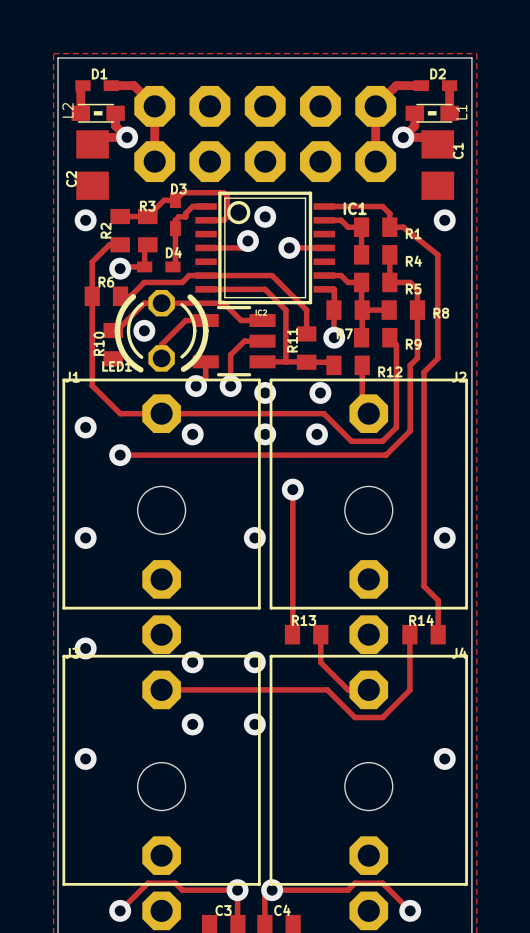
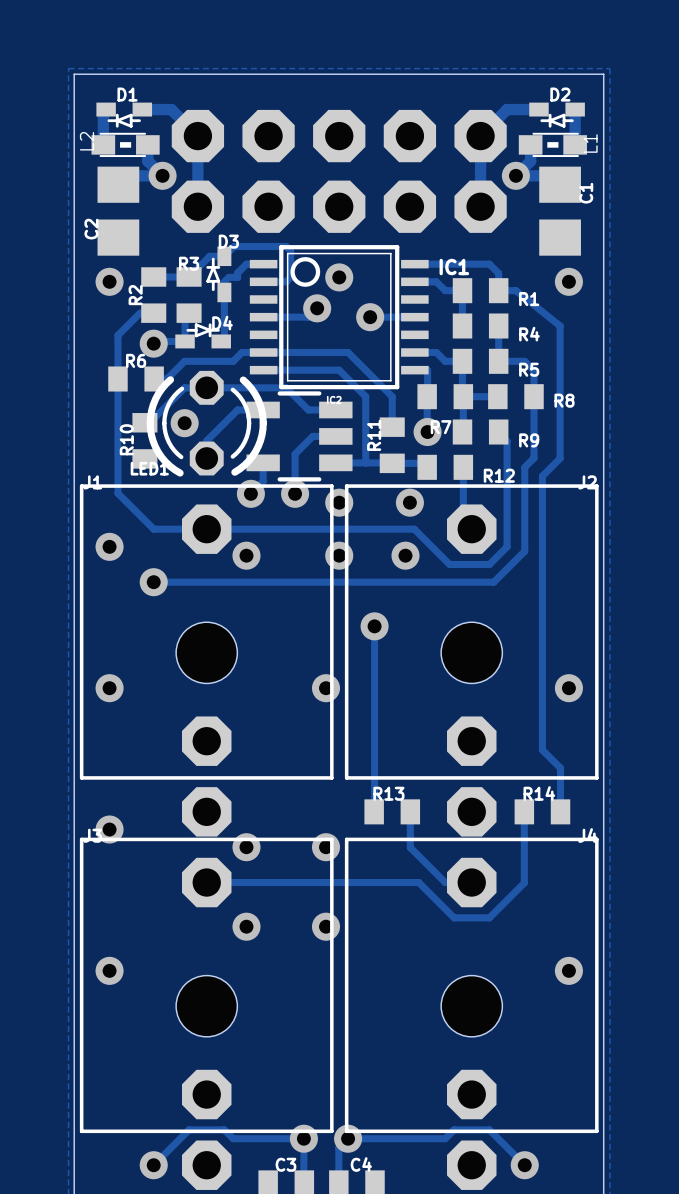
D1 footprint: [75, 80, 119, 92] -> [96, 102, 153, 128]
D2 footprint: [413, 80, 458, 92] -> [529, 102, 585, 128]
D3 footprint: [169, 192, 181, 237] -> [206, 246, 232, 303]
D4 footprint: [137, 261, 181, 273] -> [175, 323, 231, 349]

